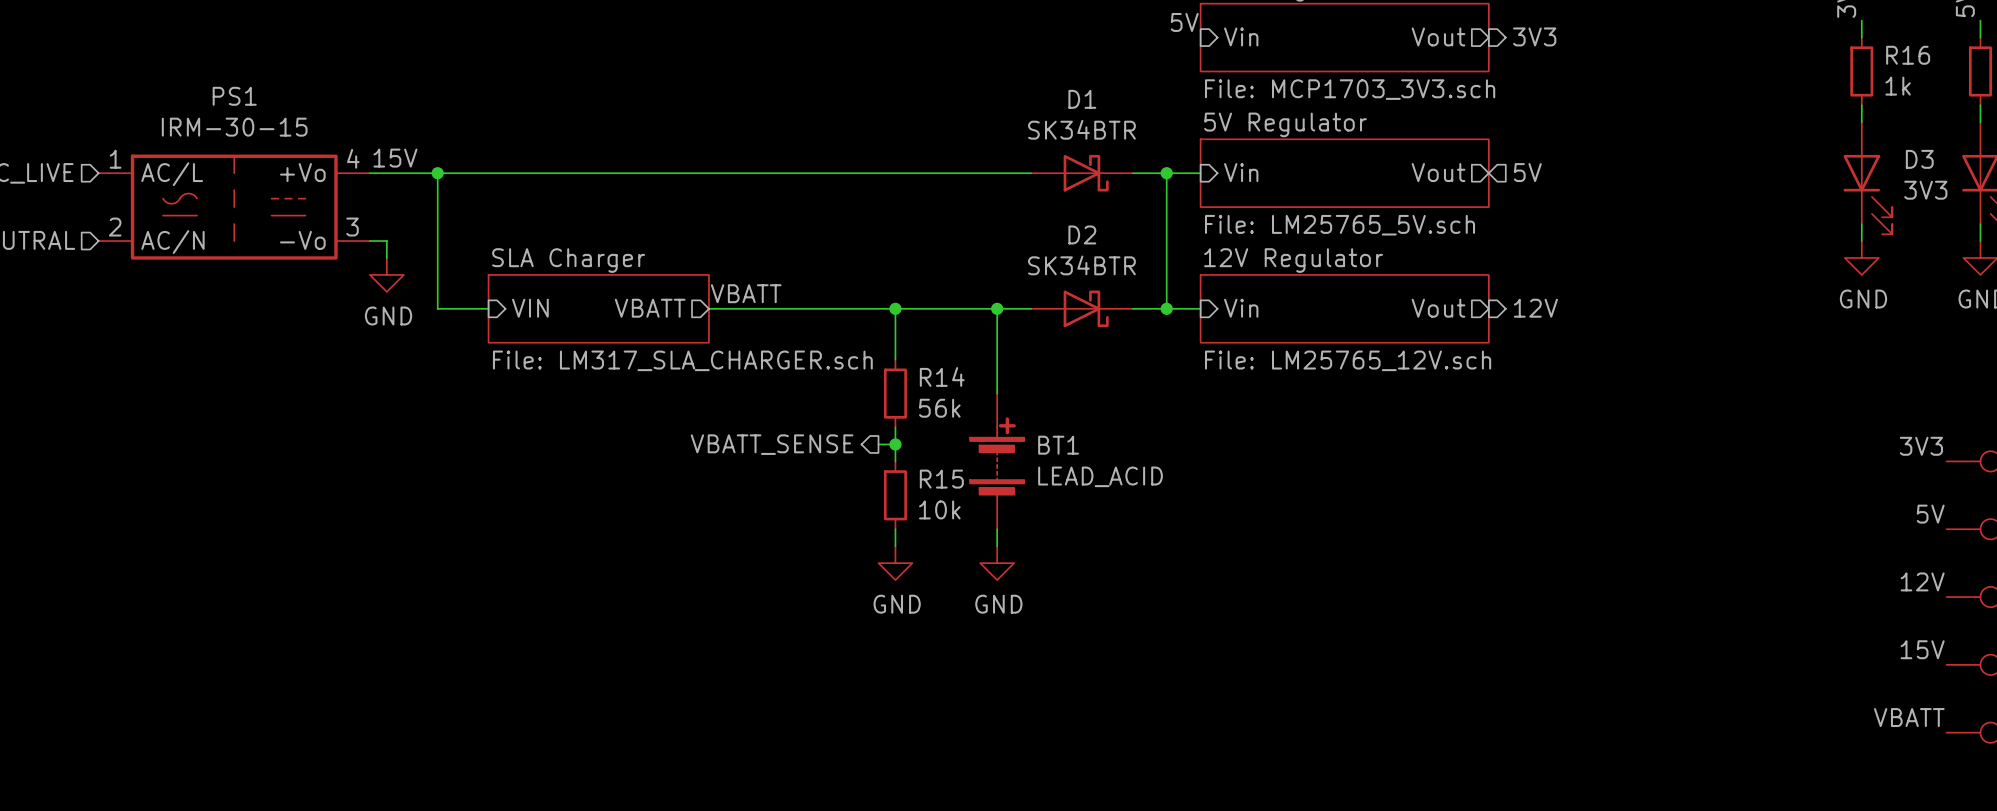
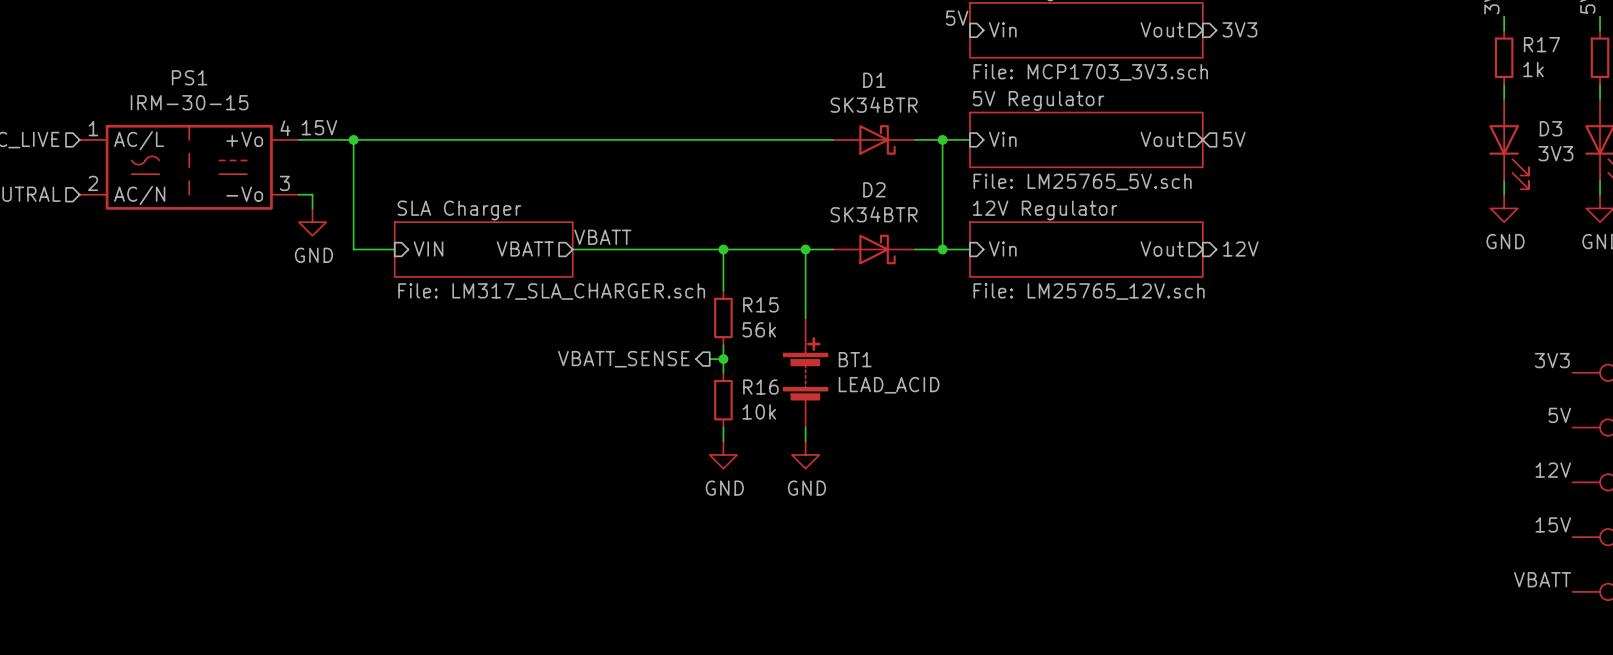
R16 name: R16 (1908, 55) -> R17 (1541, 44)
R14 name: R14 (942, 376) -> R15 (760, 304)
R15 name: R15 (941, 479) -> R16 (760, 387)

